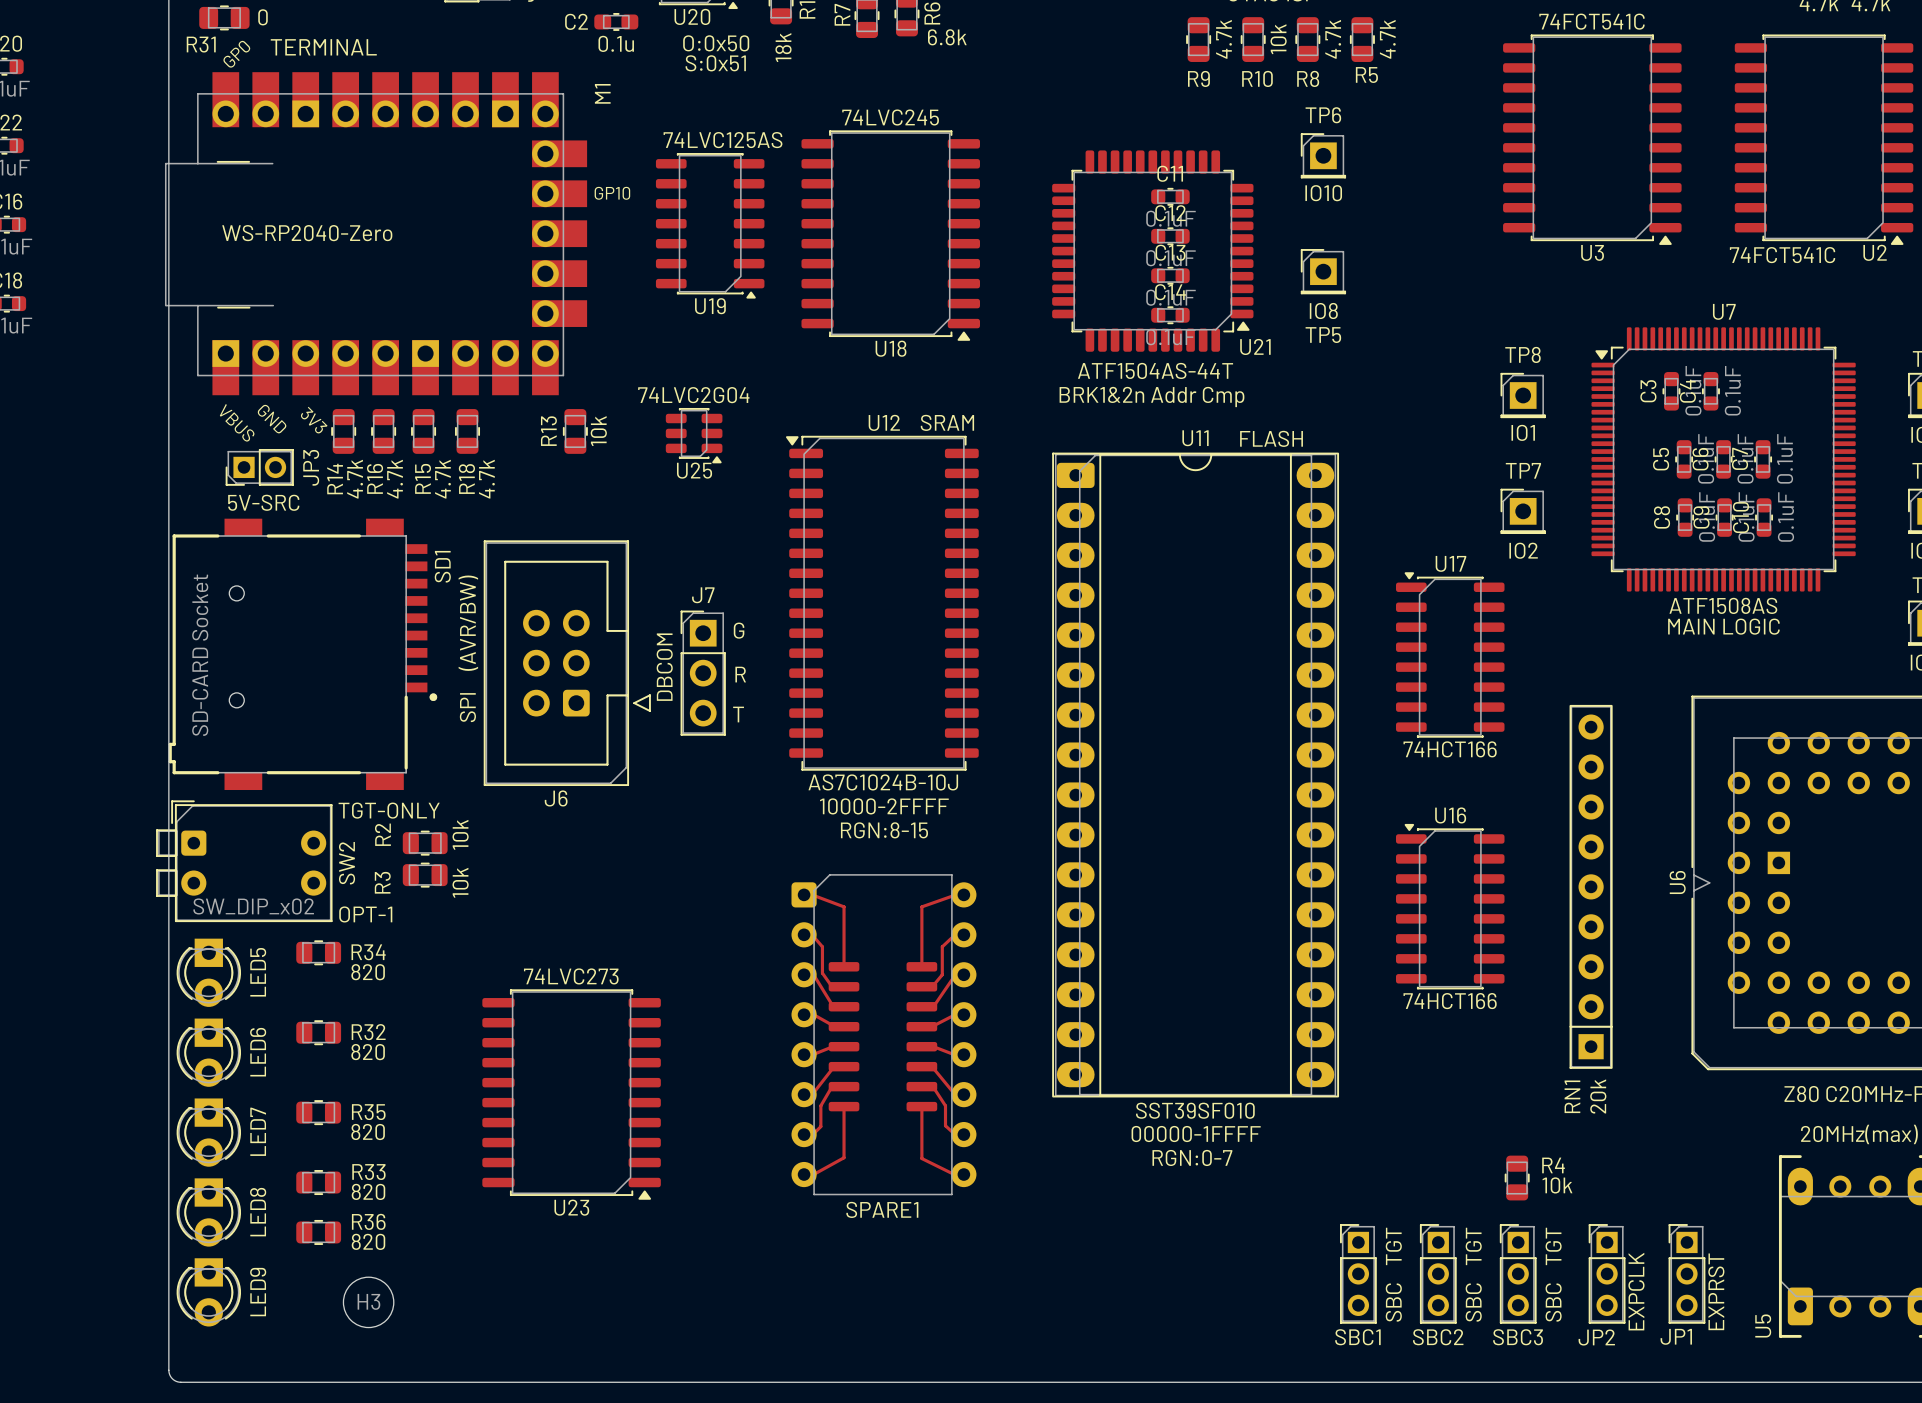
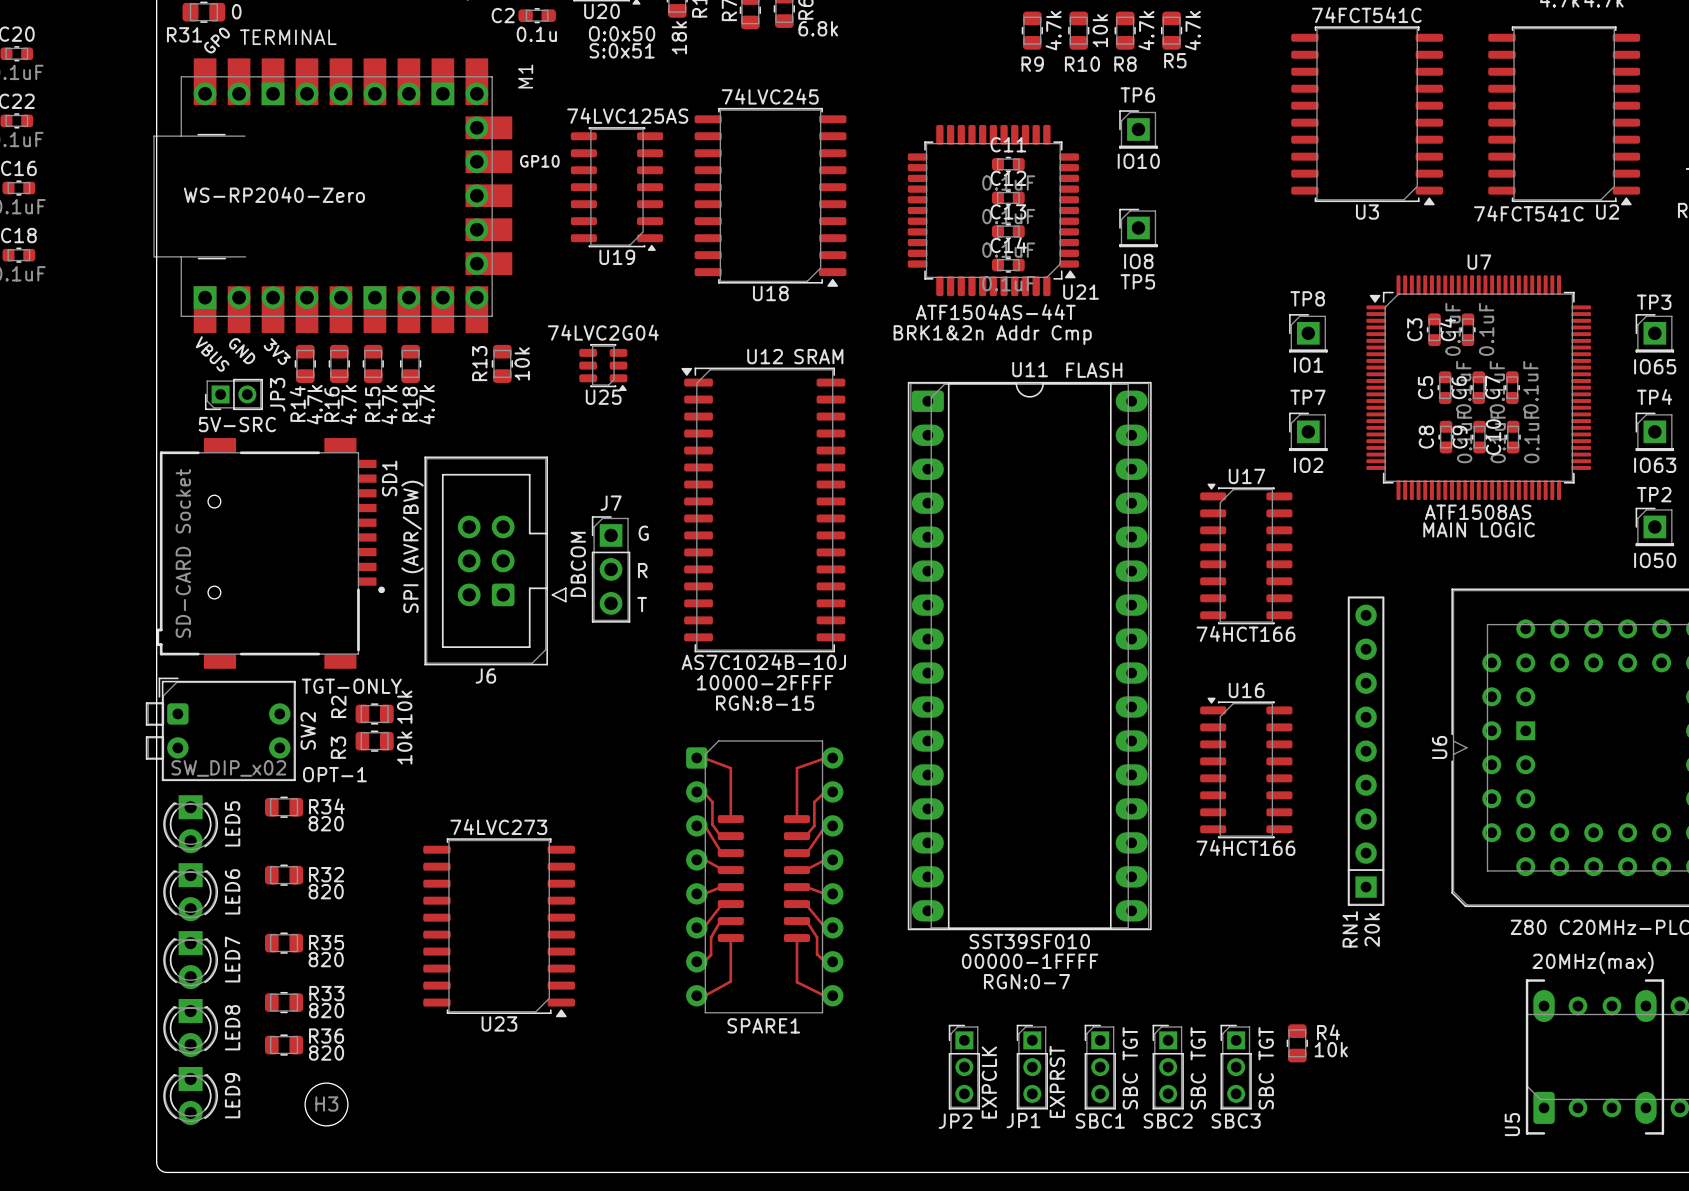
R4 position: (1517, 1178) -> (1297, 1043)
SBC1 position: (1358, 1273) -> (1100, 1067)
SBC2 position: (1438, 1273) -> (1168, 1067)
SBC3 position: (1518, 1273) -> (1236, 1067)
JP2 position: (1607, 1273) -> (964, 1067)
JP1 position: (1686, 1273) -> (1032, 1067)

